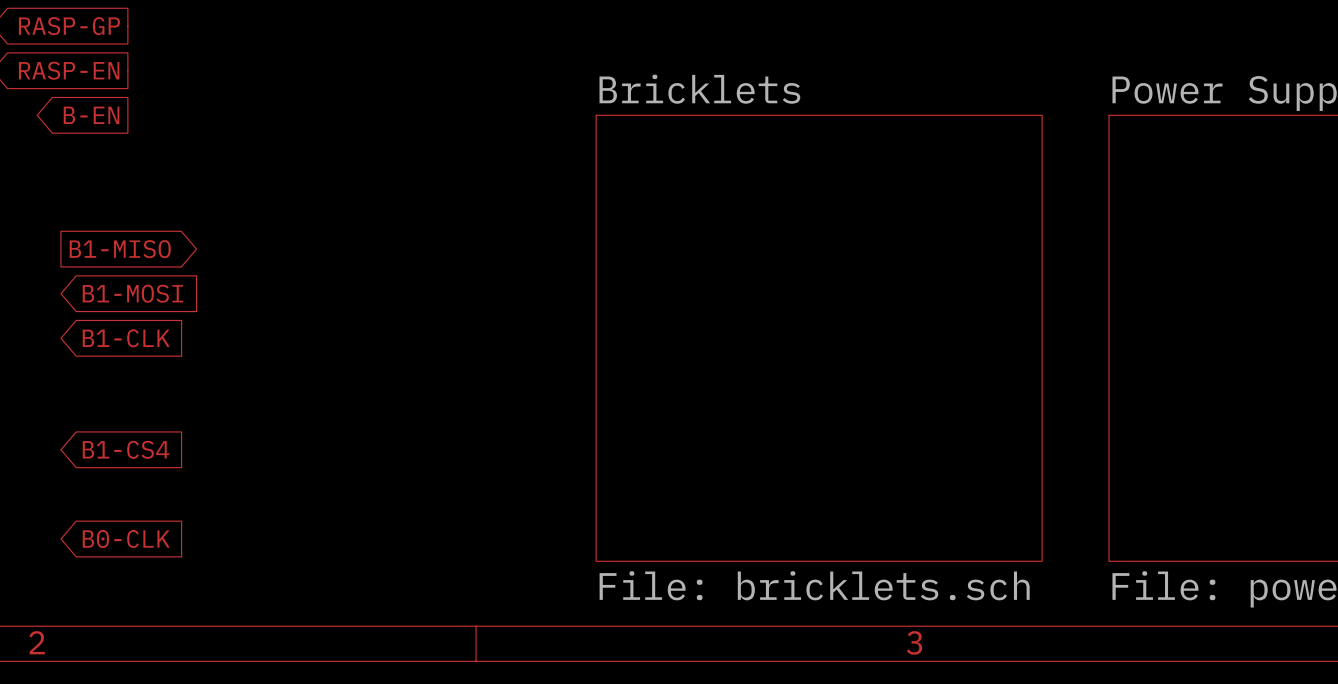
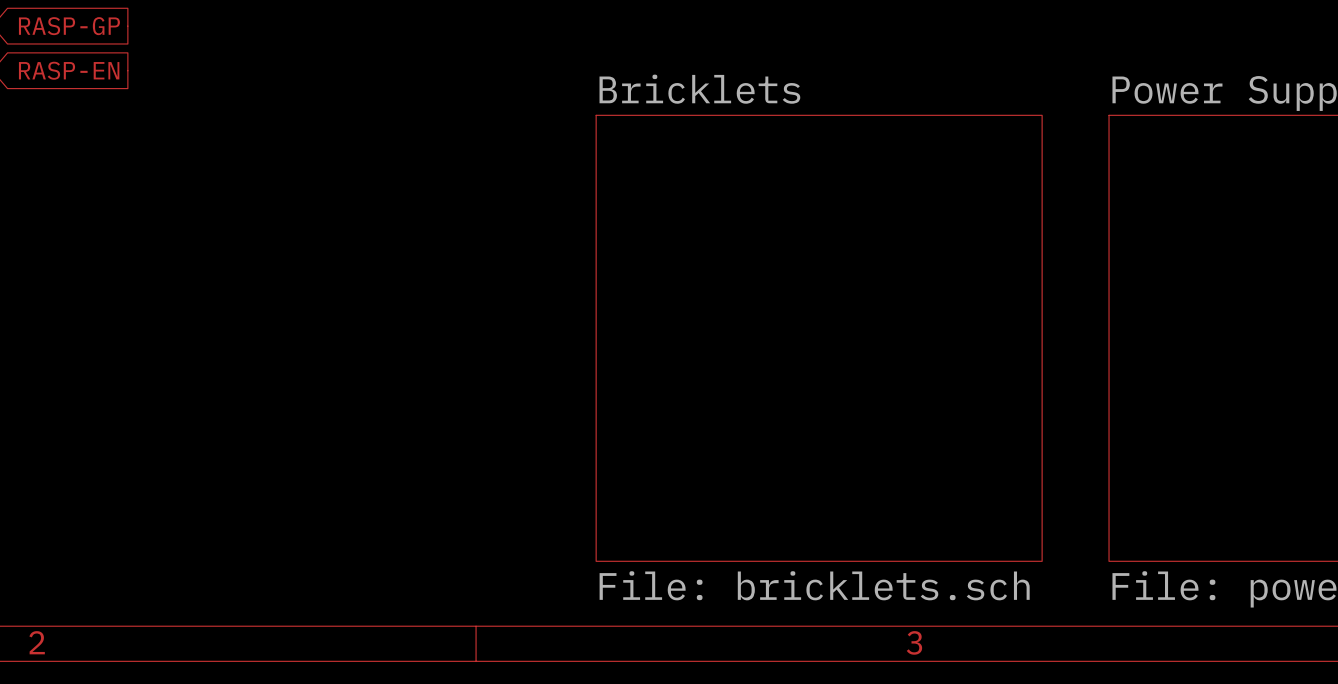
global label: B-EN (91, 115) -> none
global label: B1-MISO (120, 249) -> none
global label: B1-MOSI (132, 293) -> none
global label: B1-CLK (126, 338) -> none
global label: B1-CS4 (126, 449) -> none
global label: B0-CLK (126, 539) -> none

